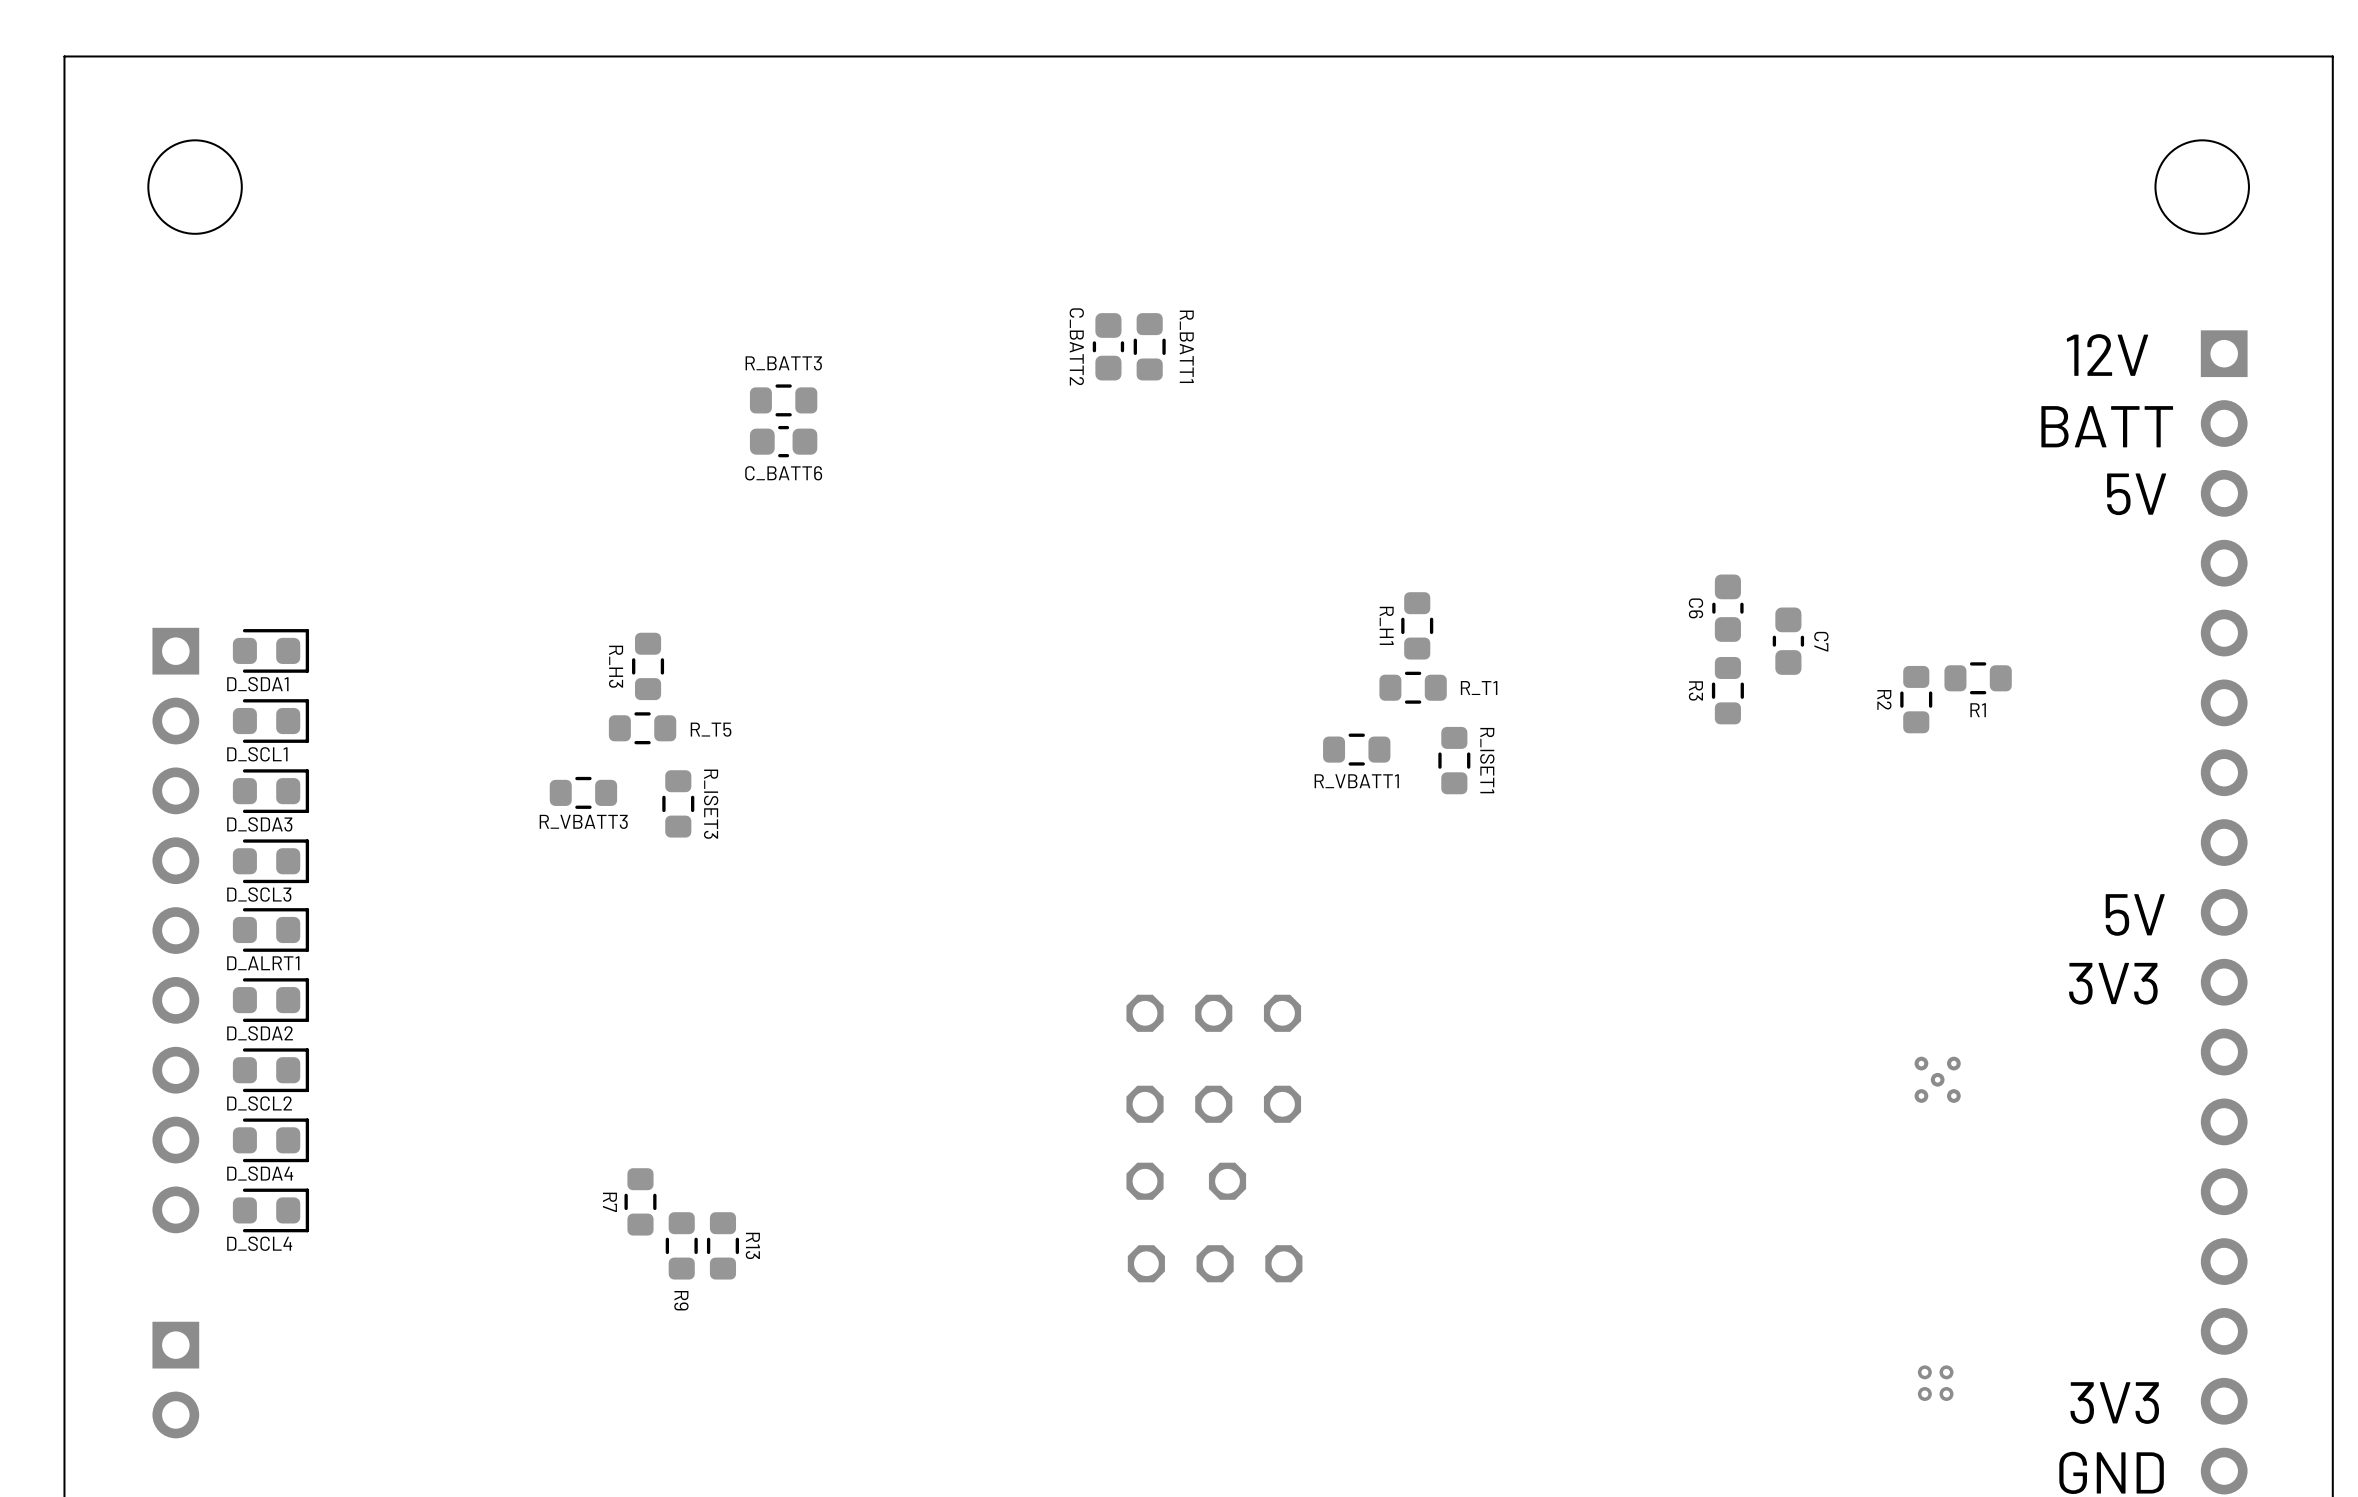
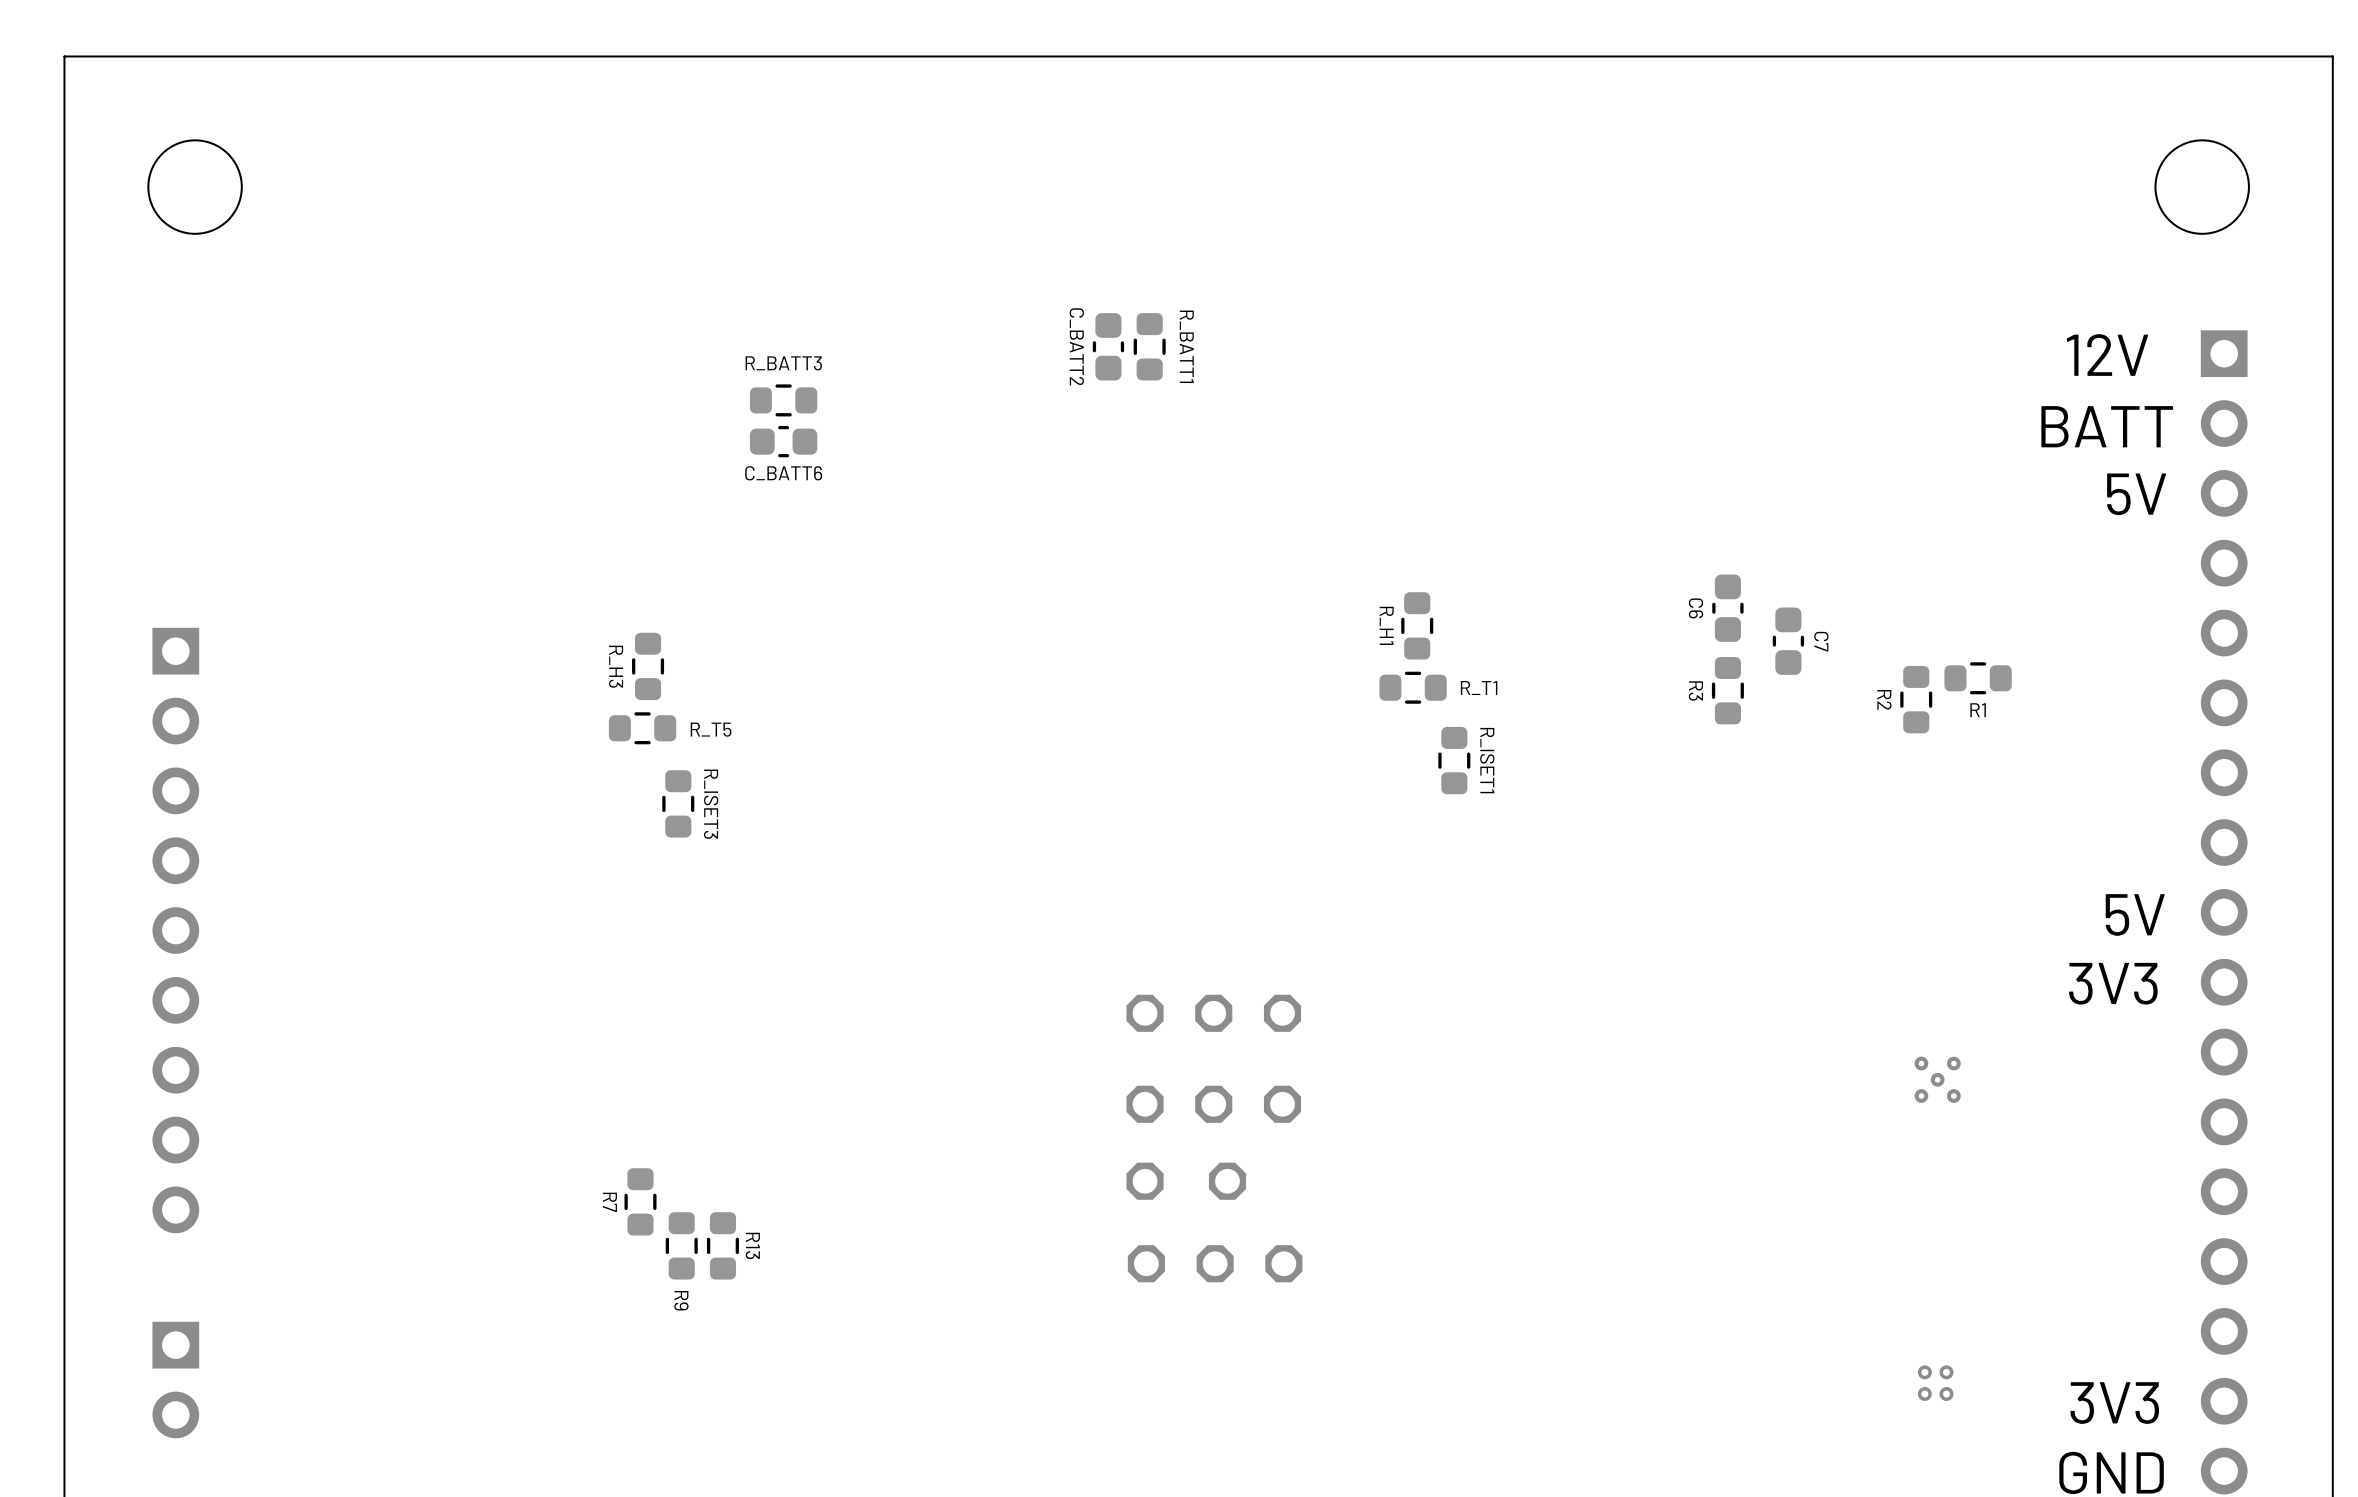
D_SDA1: (270, 650) -> none
D_SCL1: (270, 721) -> none
R_VBATT1: (1356, 749) -> none
D_SDA3: (270, 791) -> none
R_VBATT3: (583, 792) -> none
D_SCL3: (270, 861) -> none
D_ALRT1: (270, 929) -> none
D_SDA2: (270, 1000) -> none
D_SCL2: (270, 1070) -> none
D_SDA4: (270, 1140) -> none
D_SCL4: (270, 1210) -> none

